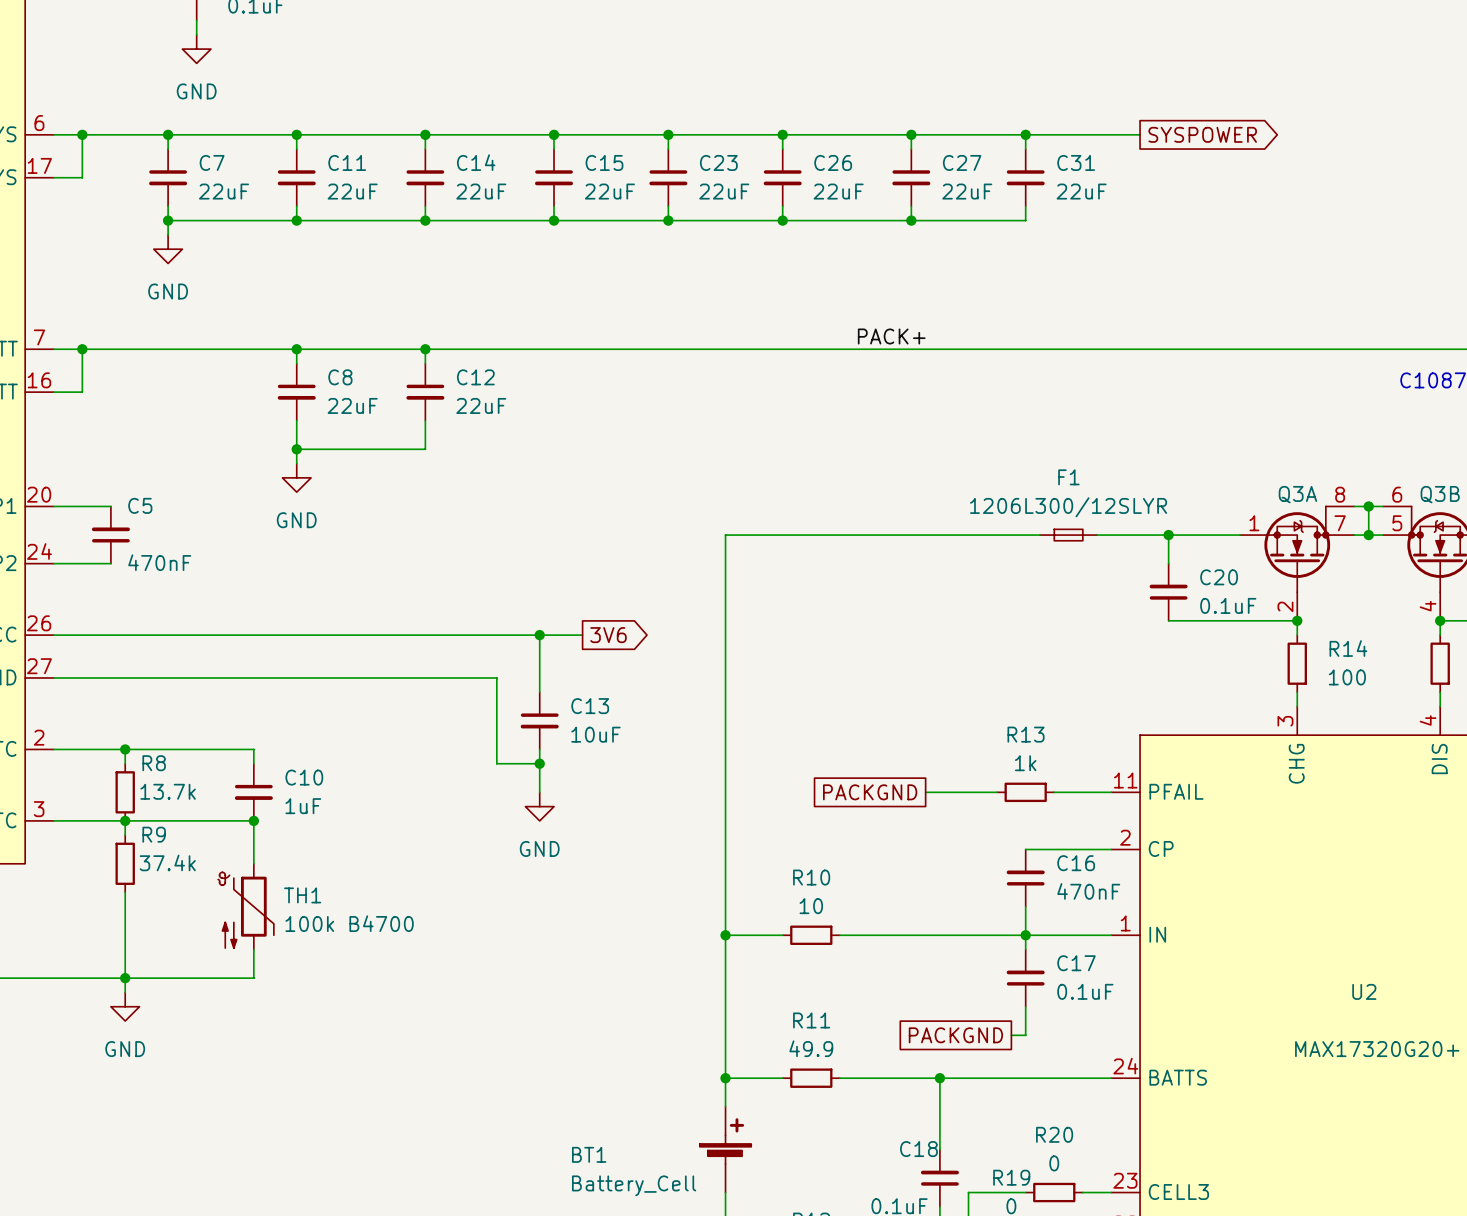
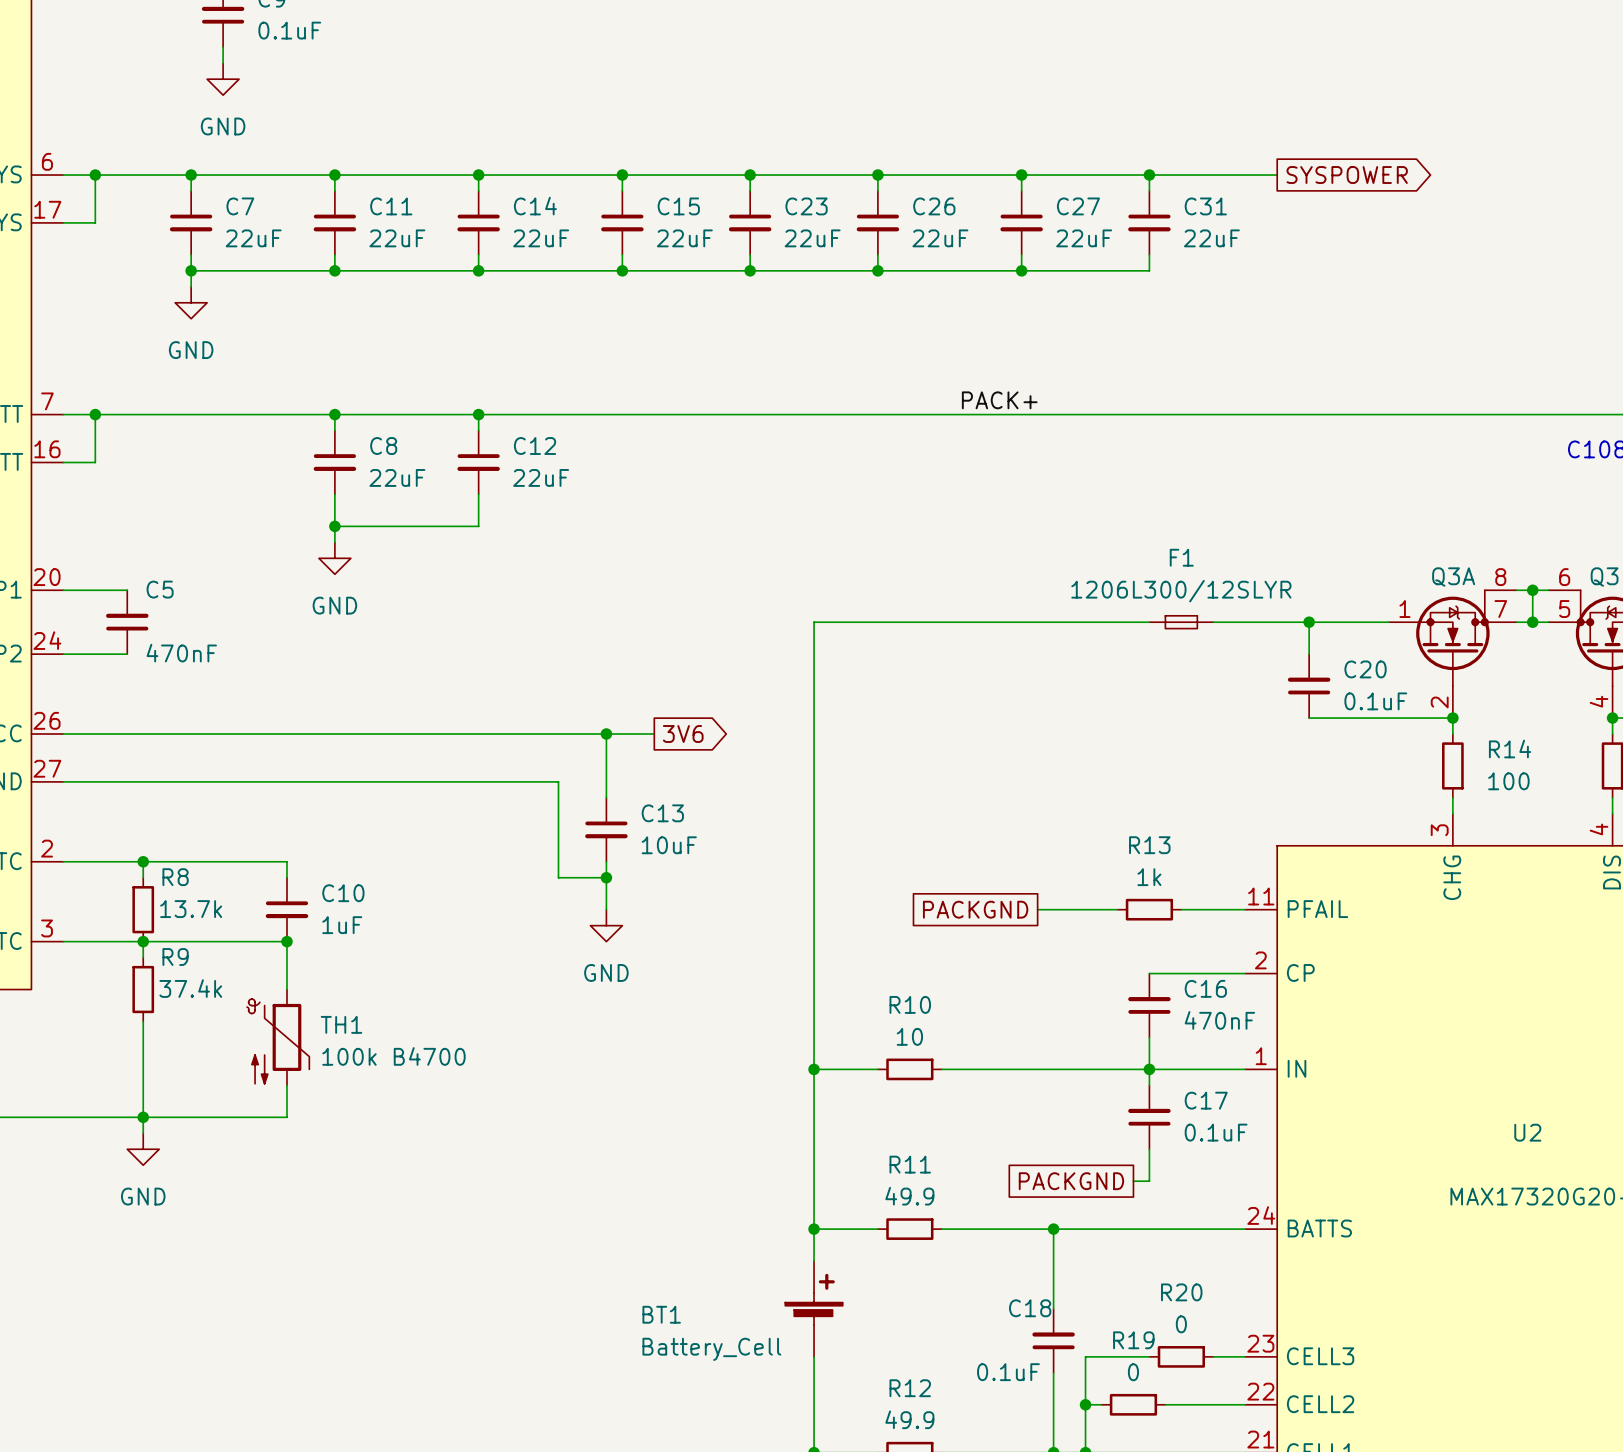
F1 position: (1068, 535) -> (1181, 622)

